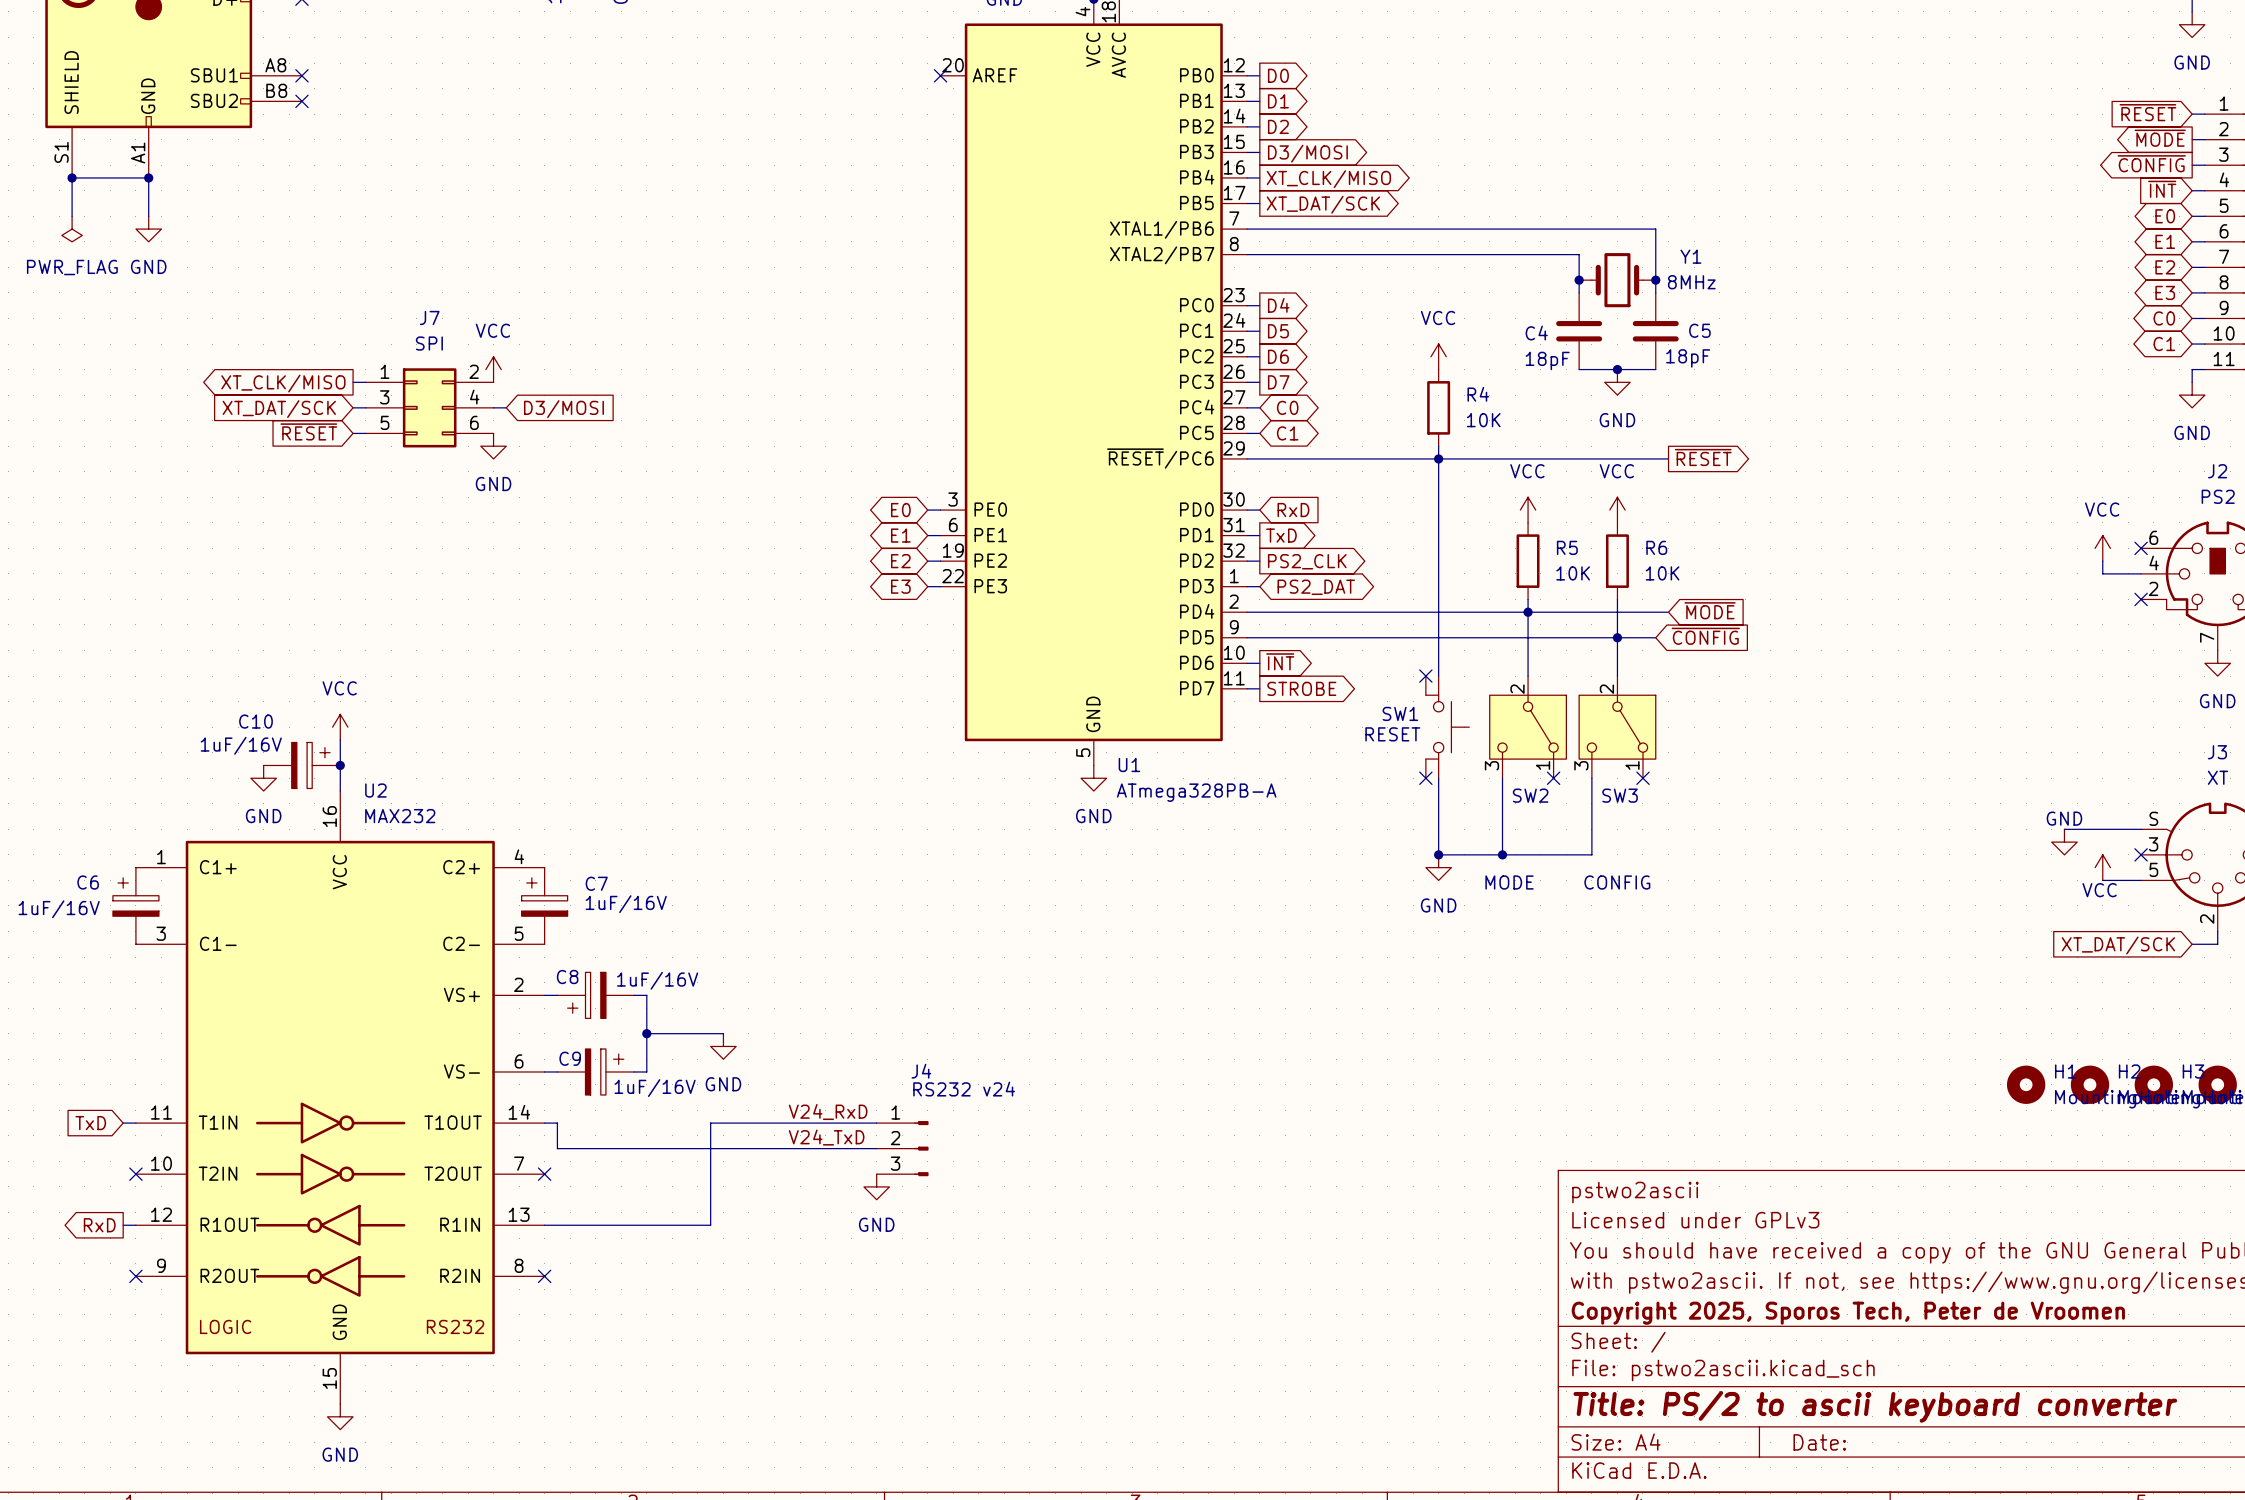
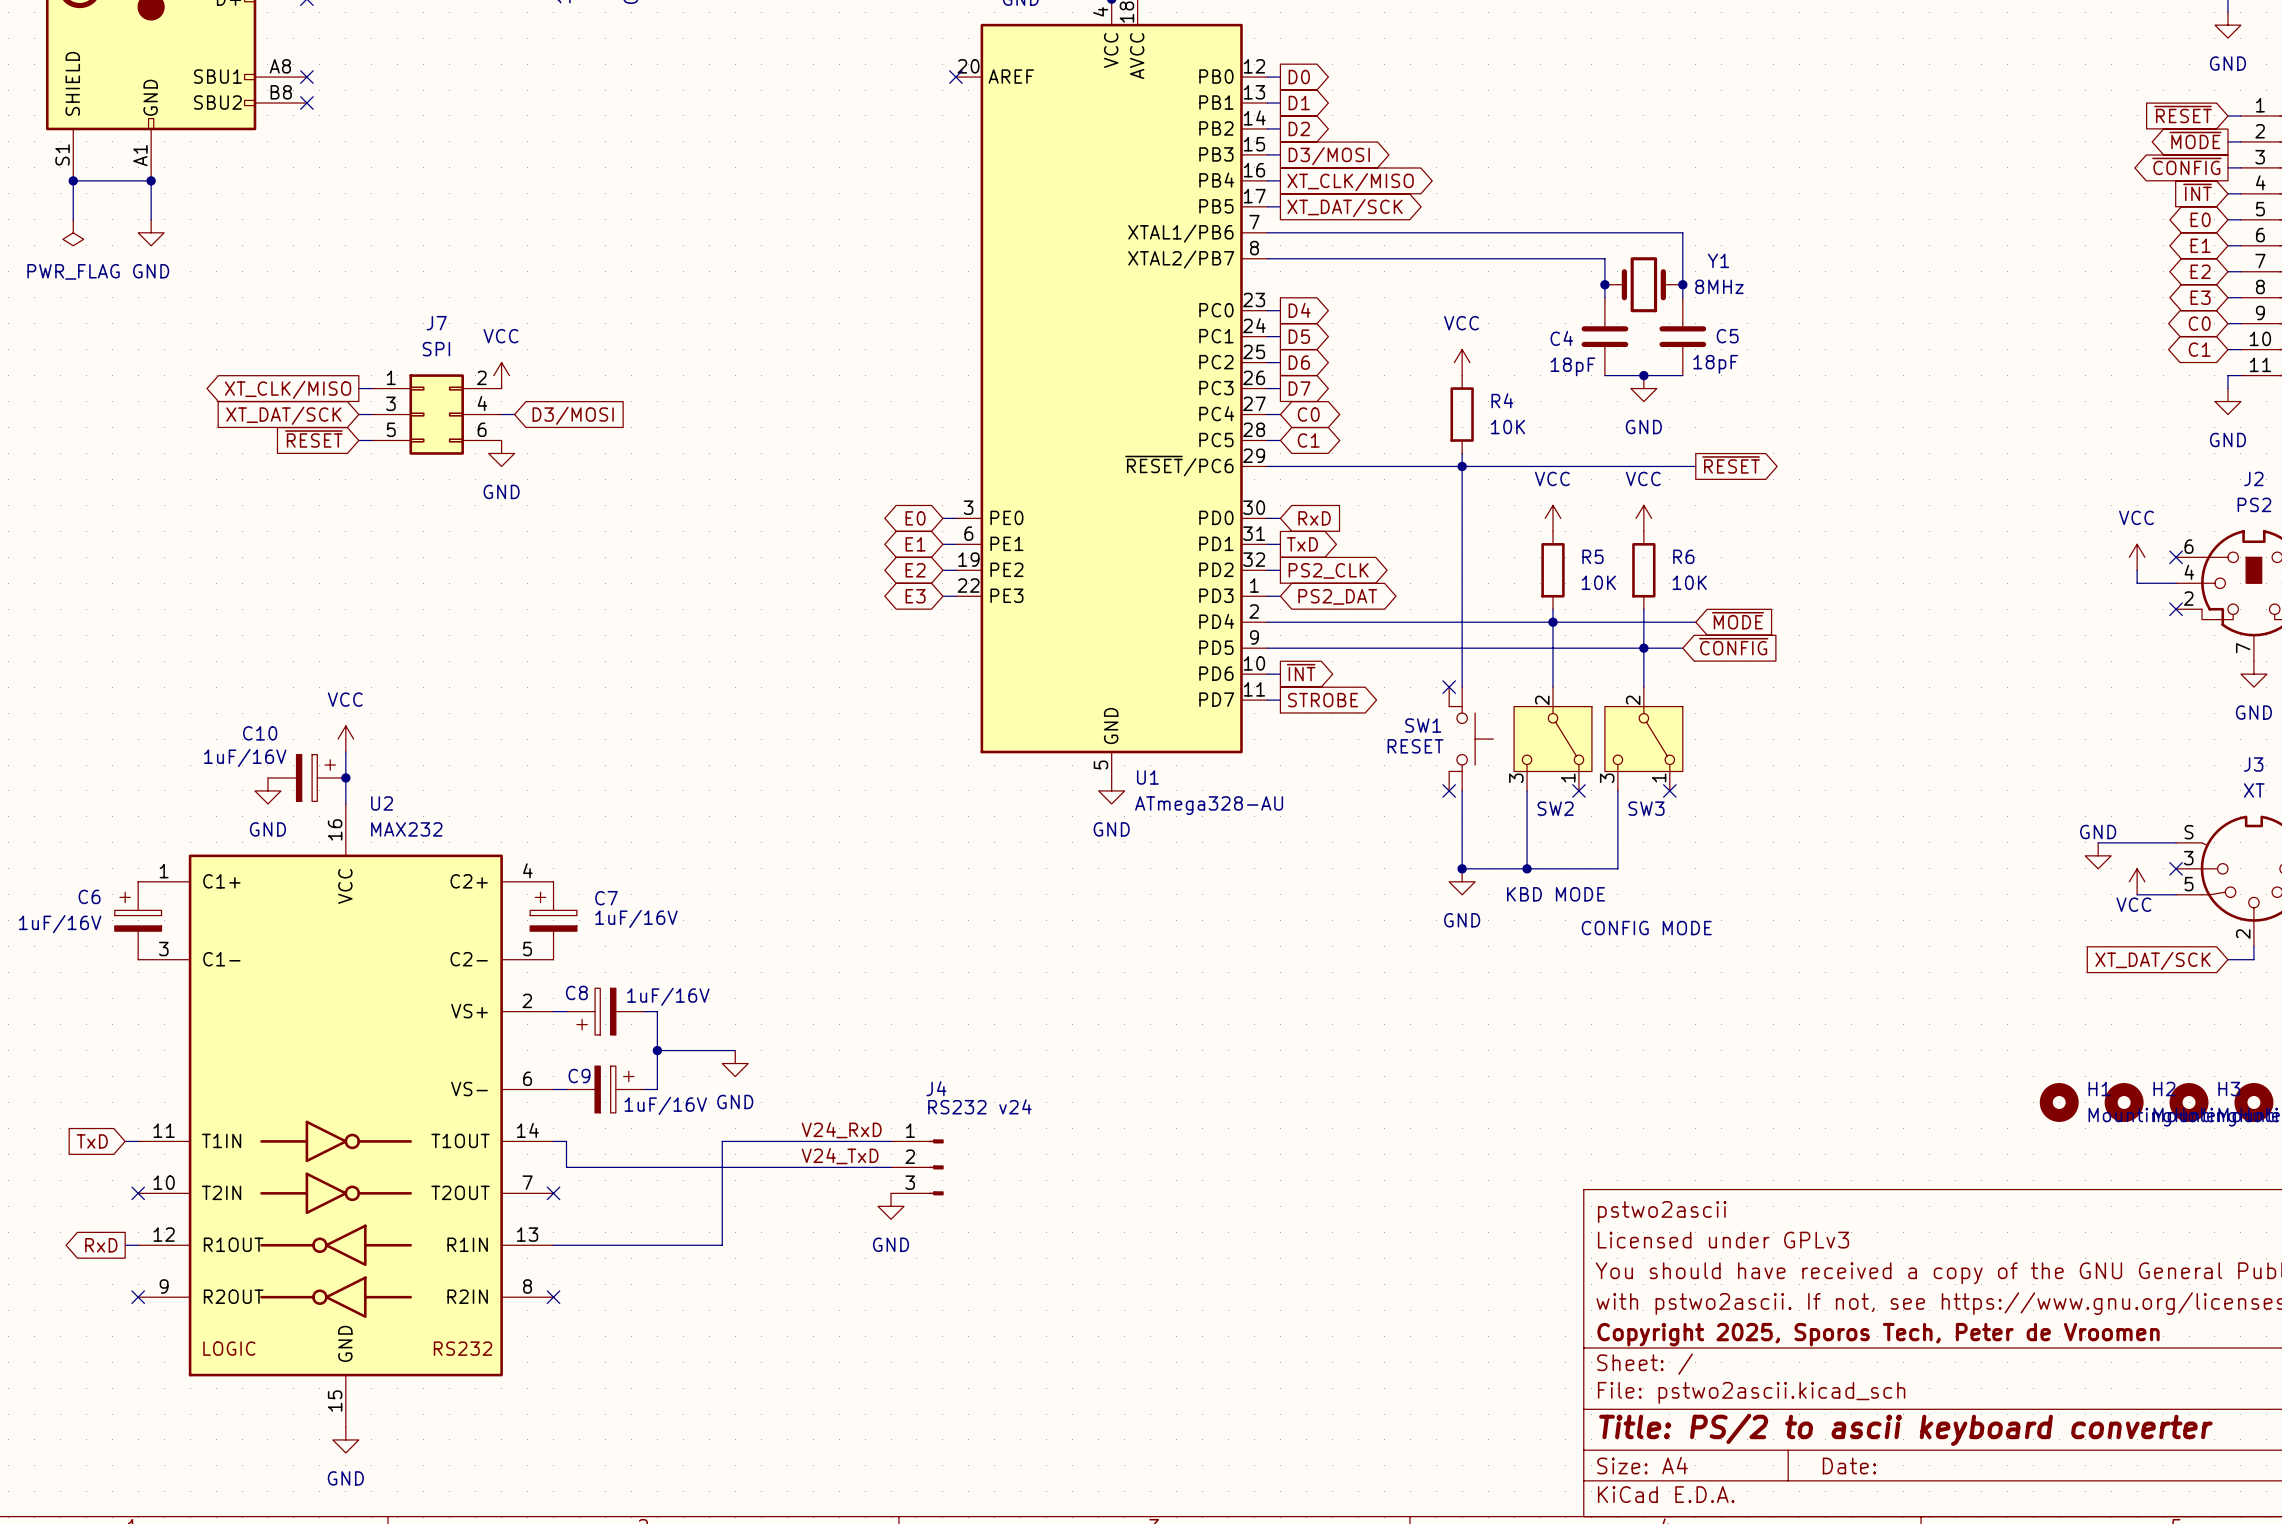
U1 value: ATmega328PB-A (1196, 792) -> ATmega328-AU (1209, 805)
SW2 value: MODE (1509, 882) -> KBD MODE (1556, 894)
SW3 value: CONFIG (1617, 882) -> CONFIG MODE (1646, 928)

